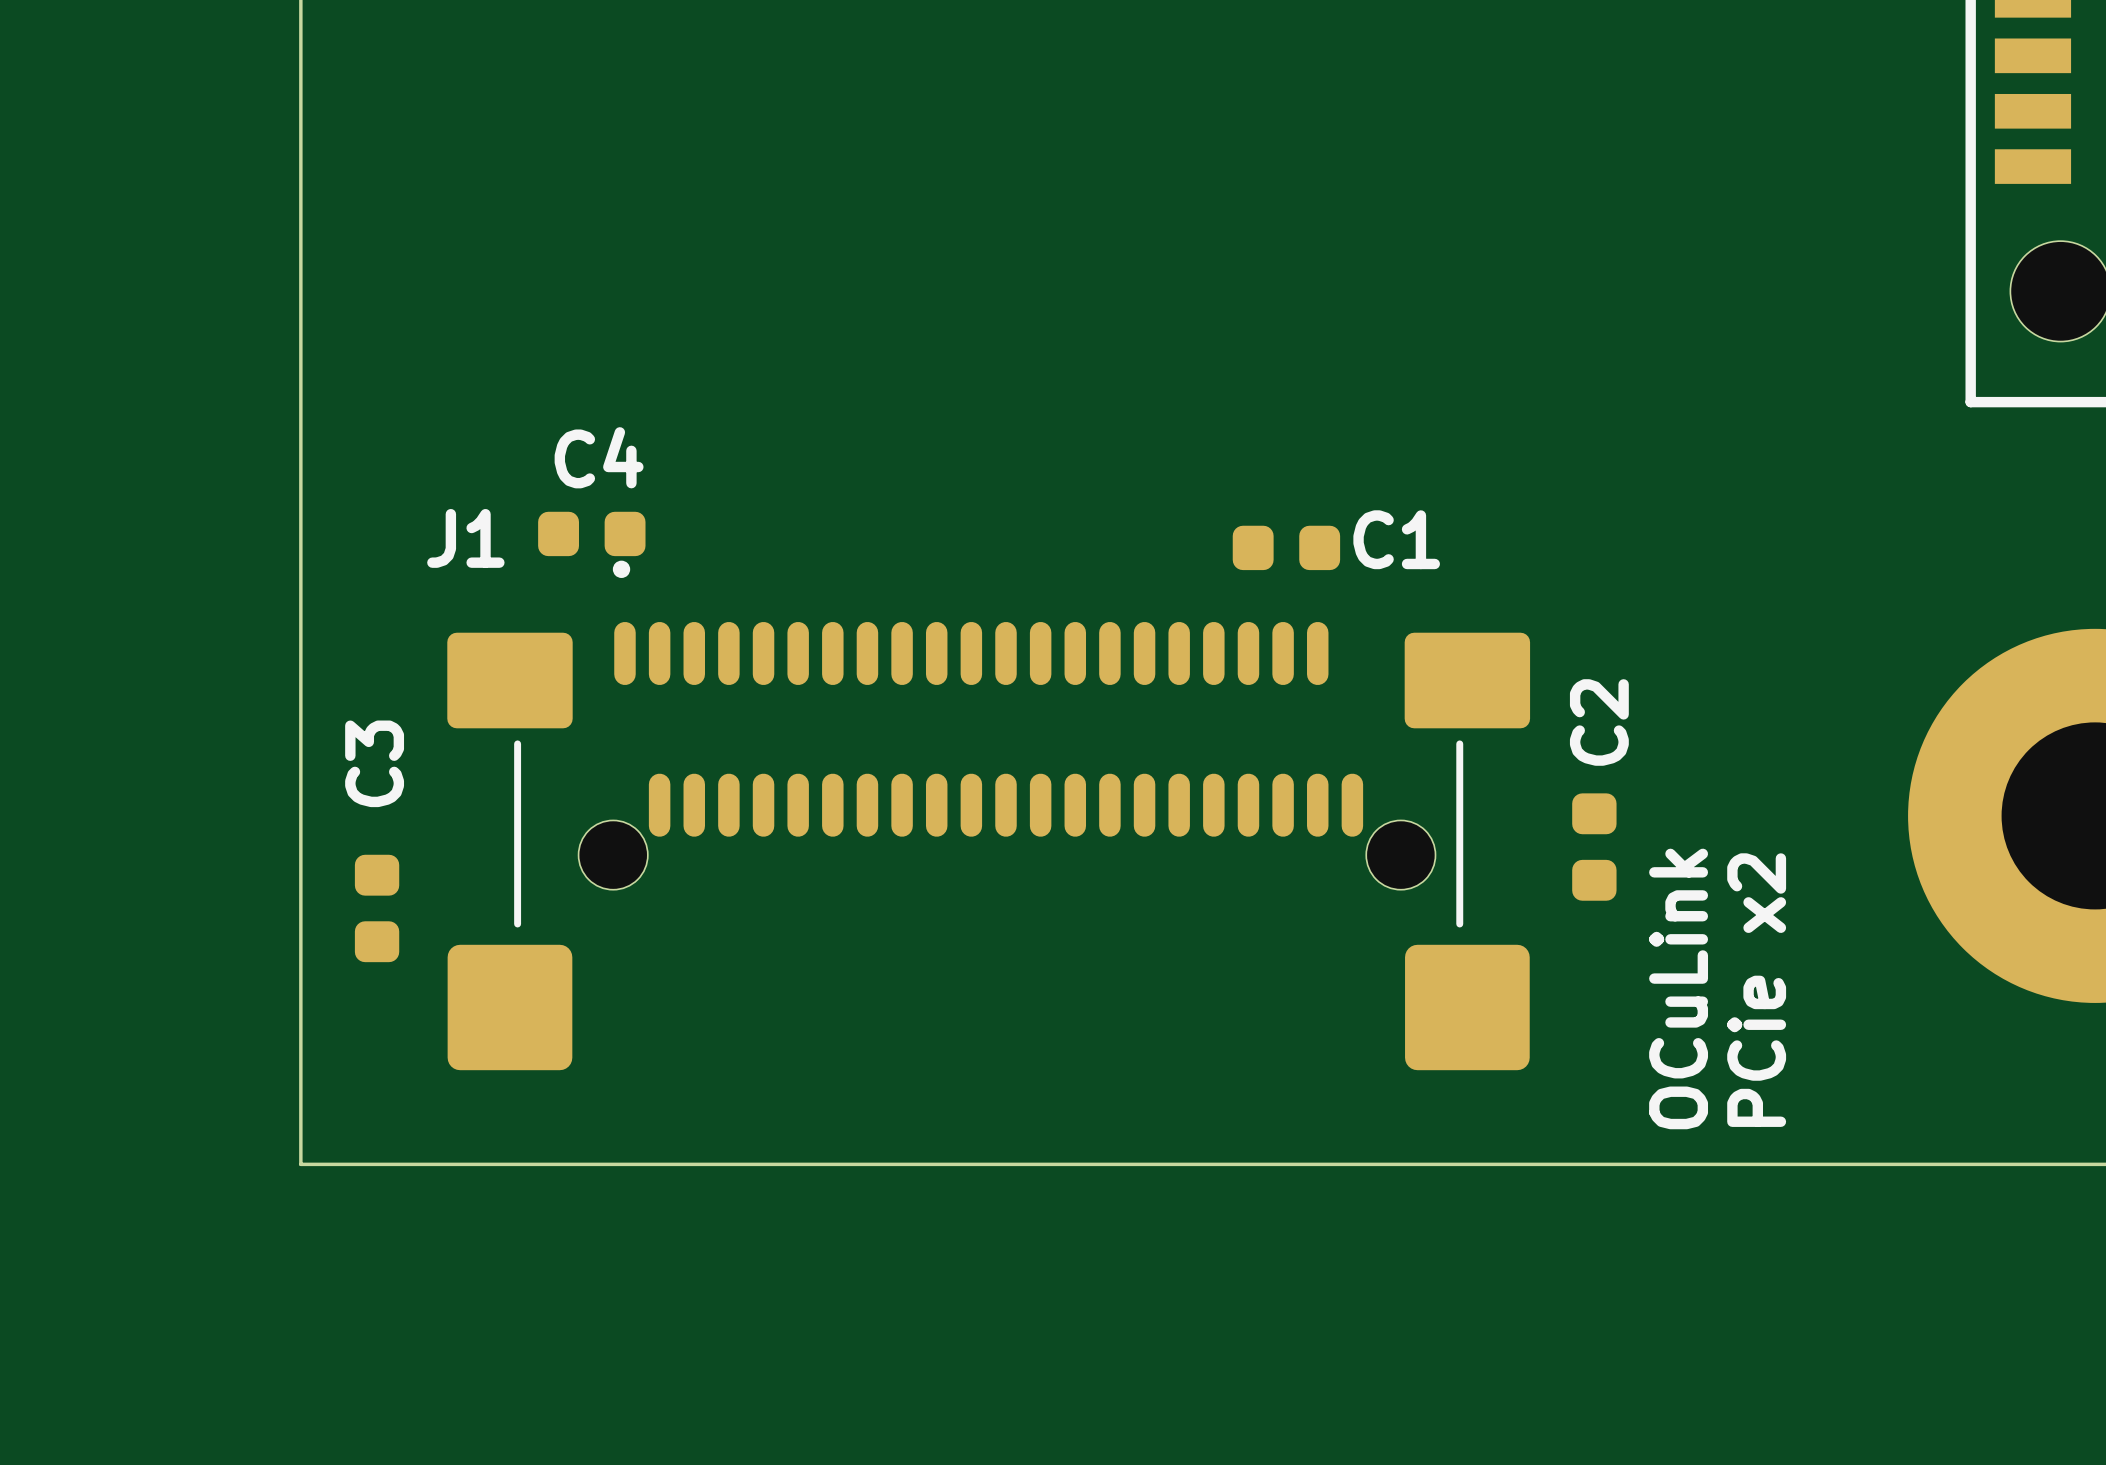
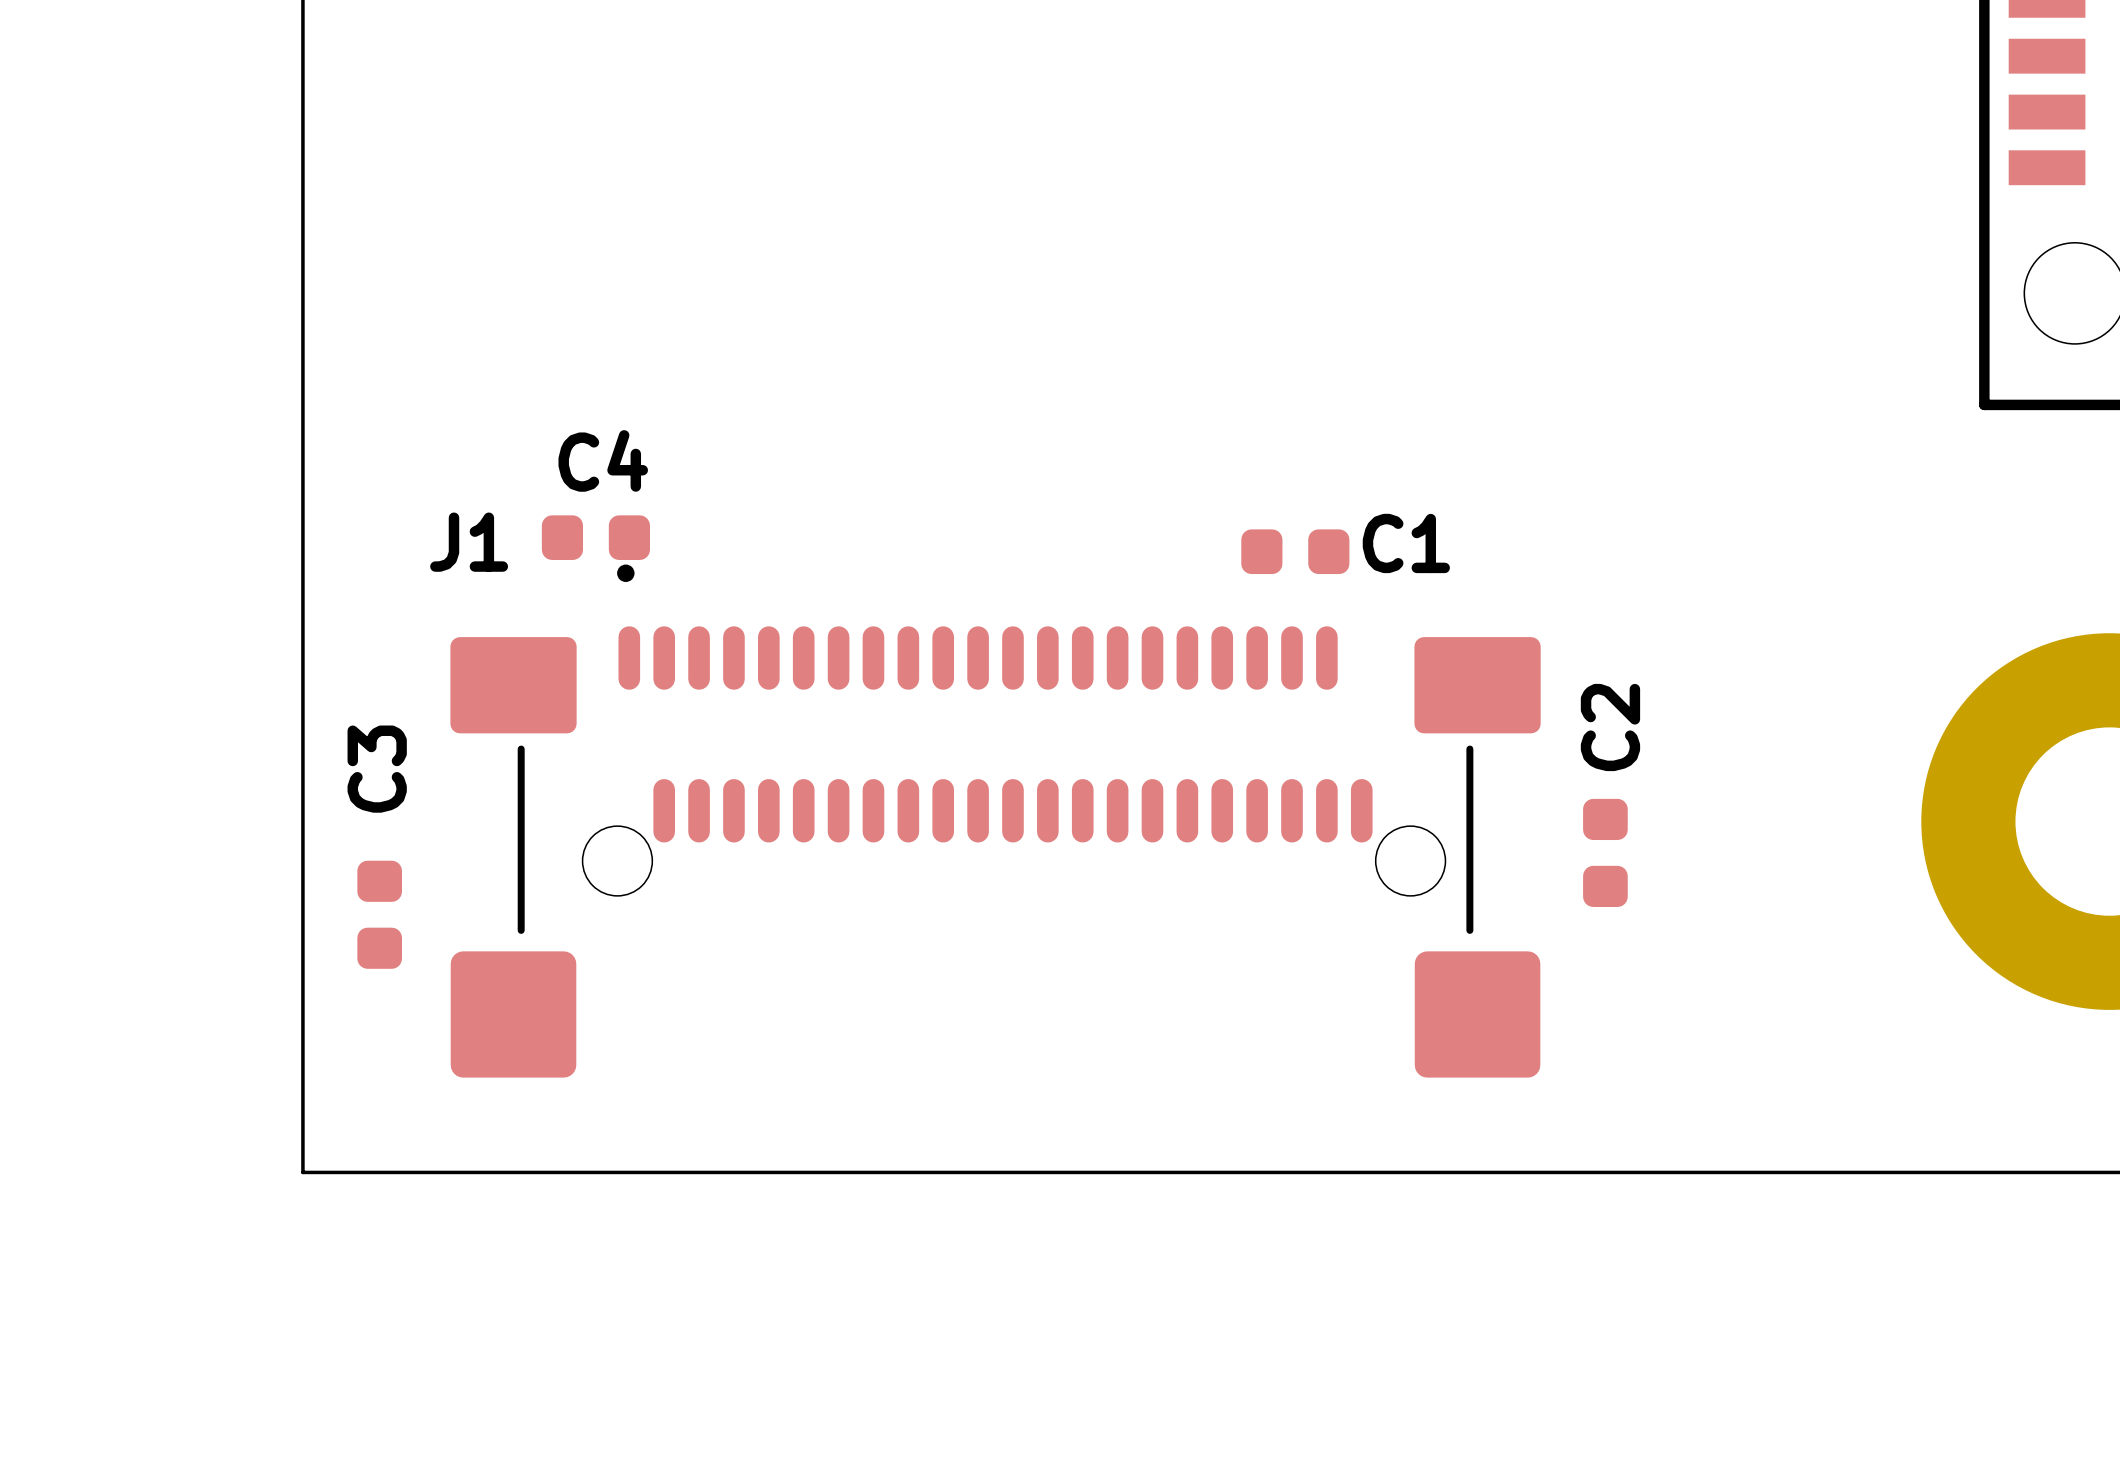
text: OCuLink (1678, 988) -> none
text: PCie x2 (1756, 990) -> none

